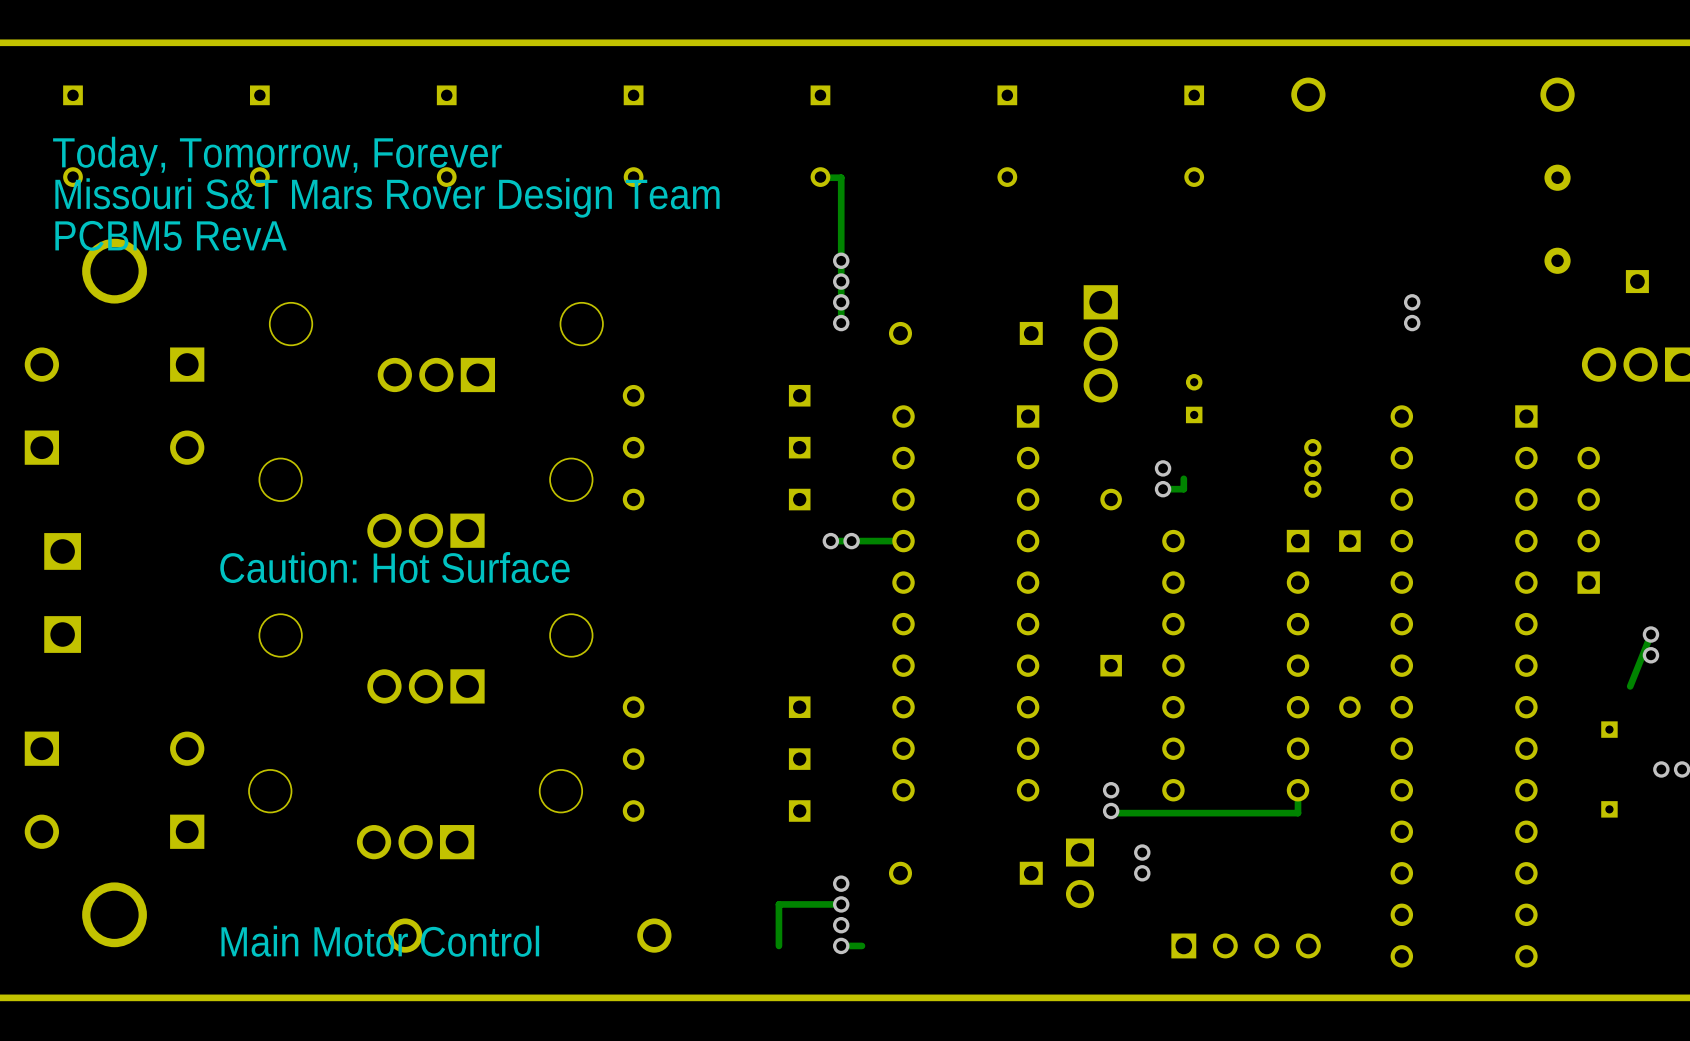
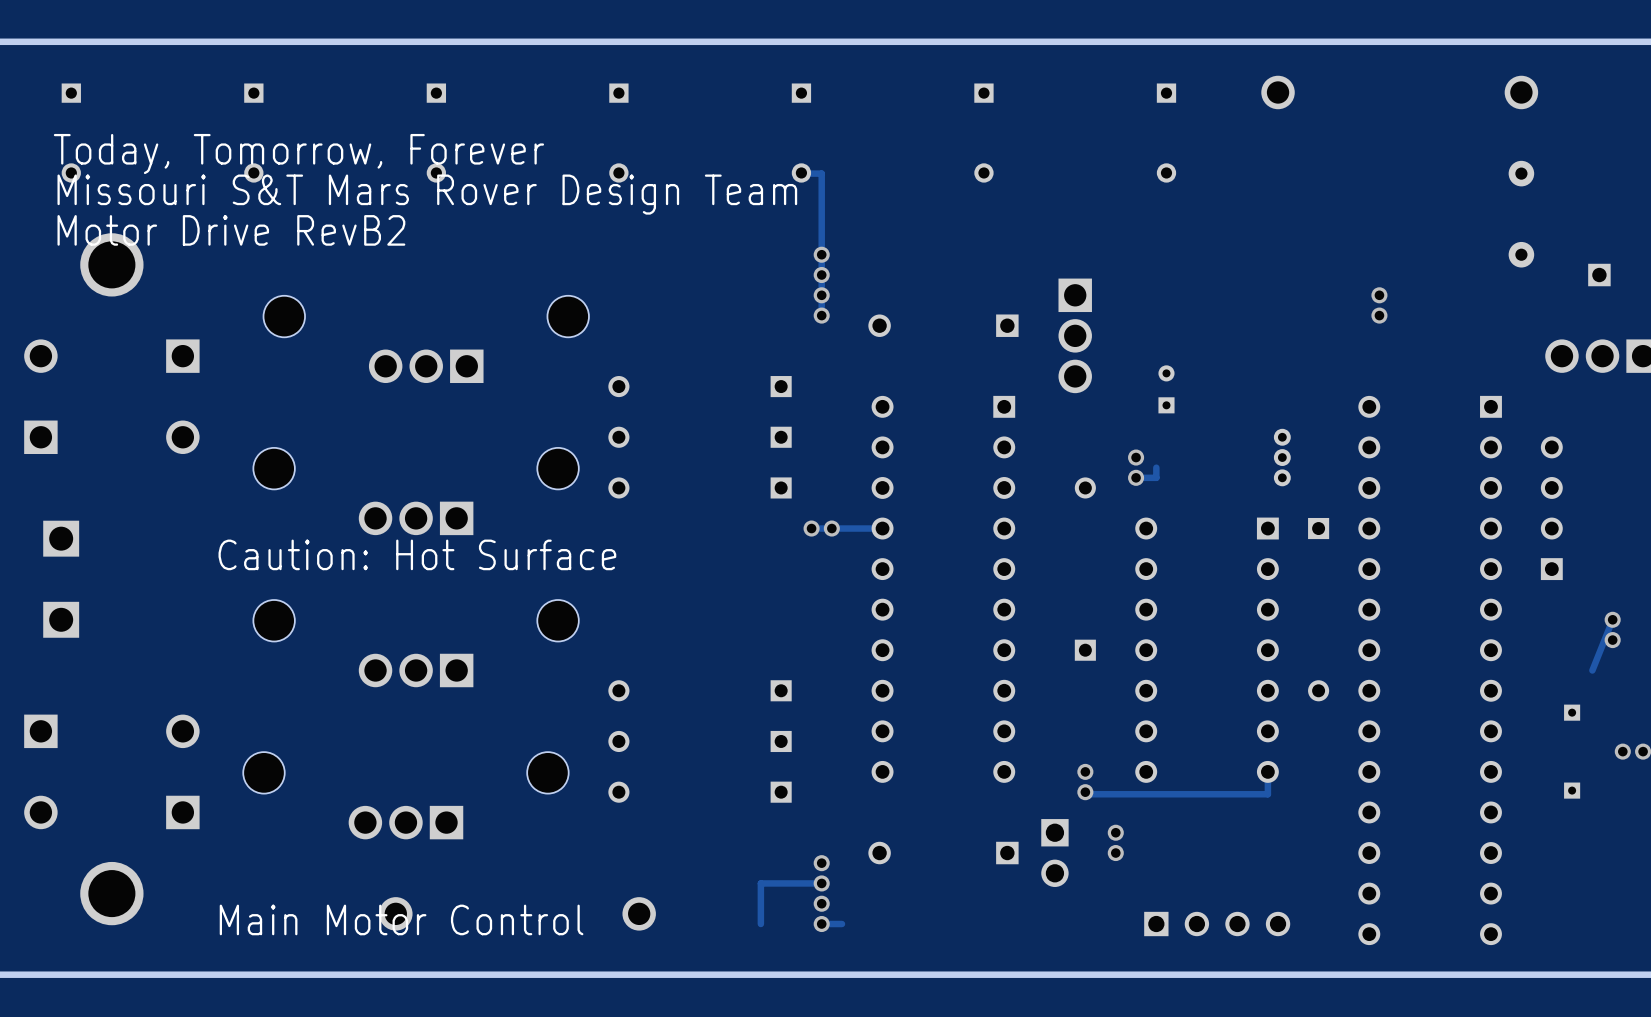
text: PCBM5 RevA (171, 235) -> Motor Drive RevB2 (231, 230)

